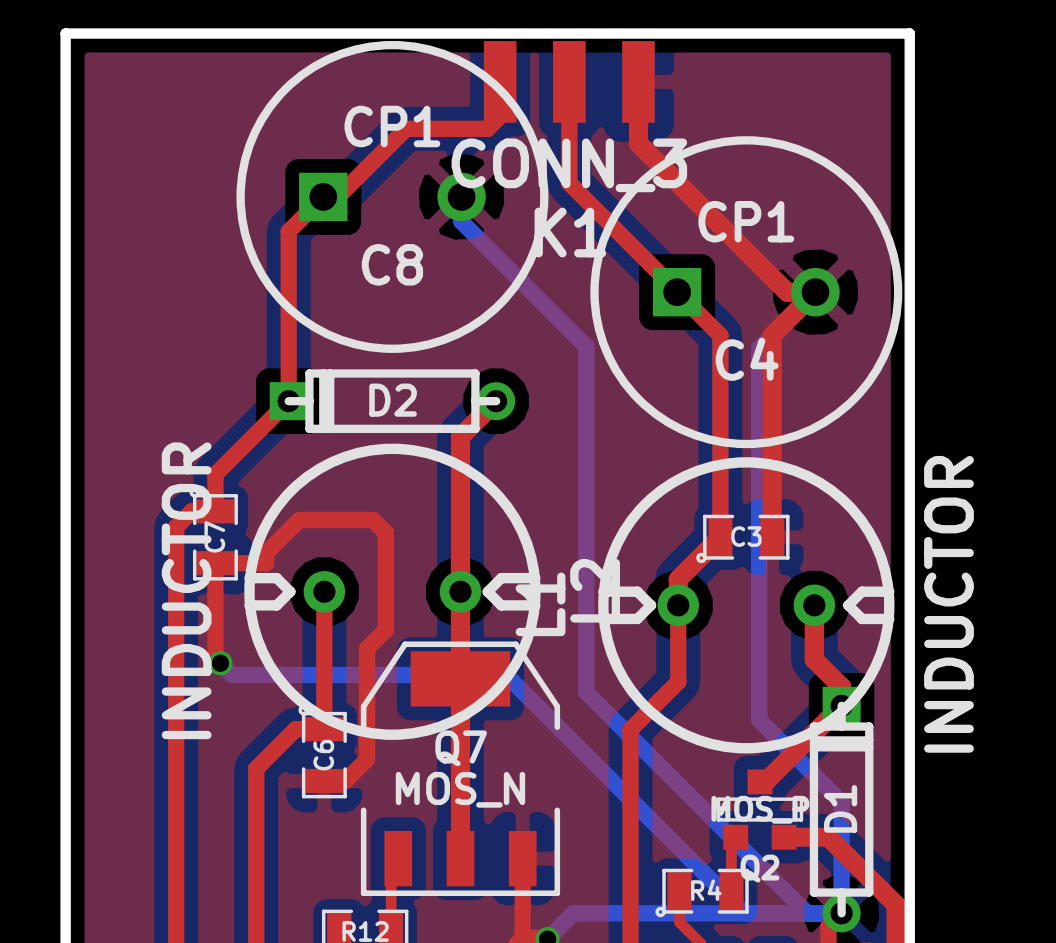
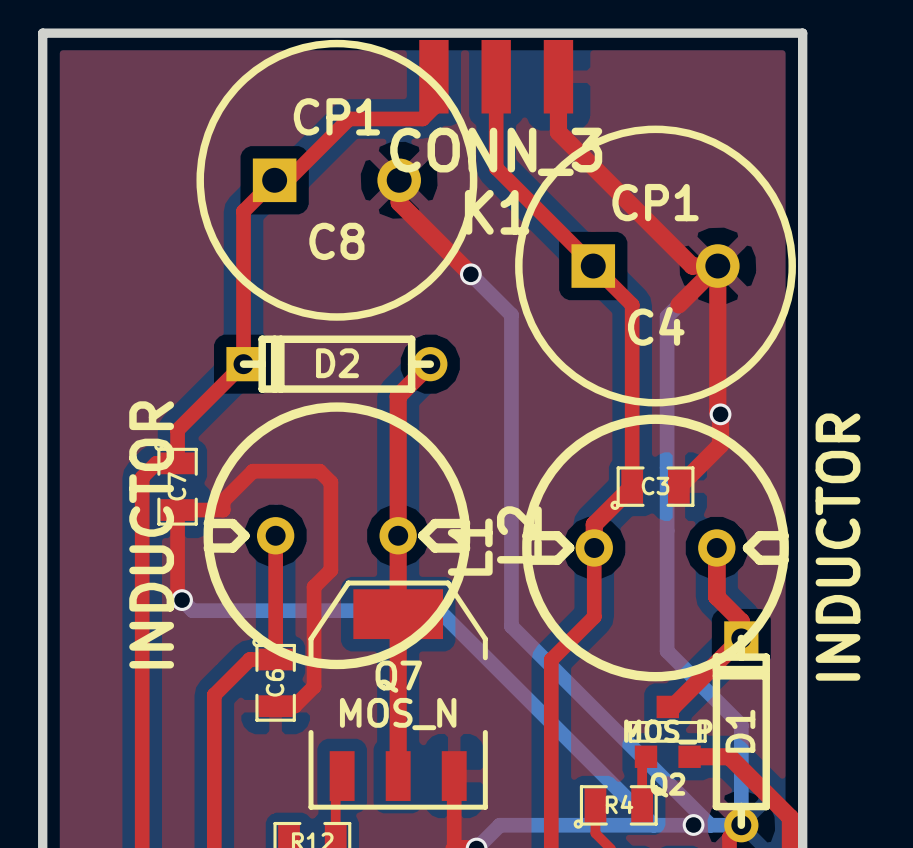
top track: none -> (399, 180) (399, 202) (470, 274)
bottom track: (461, 196) (461, 221) (541, 301) -> none
via: none -> (470, 274)
top track: (772, 335) (772, 537) -> (717, 266) (717, 411) (720, 414) (720, 444) (678, 486)
via: none -> (720, 414)
via: none -> (693, 825)

